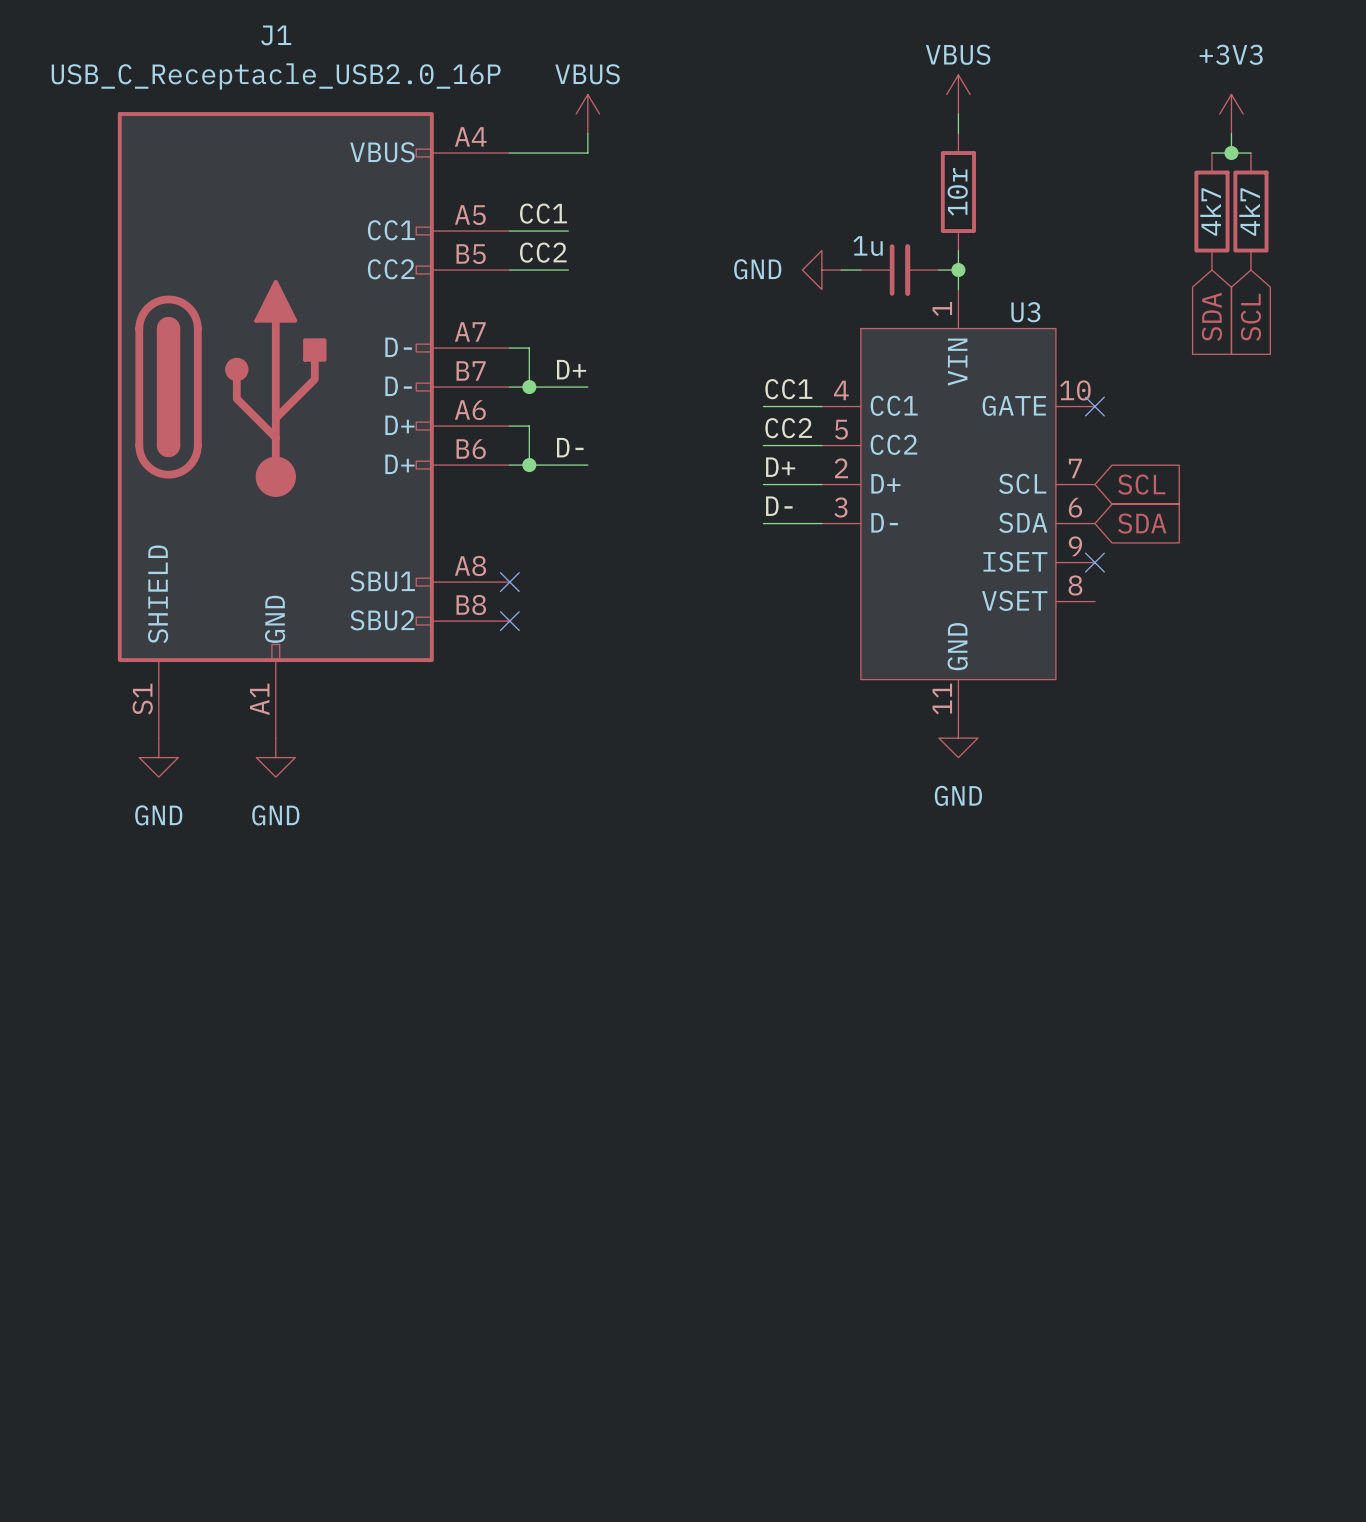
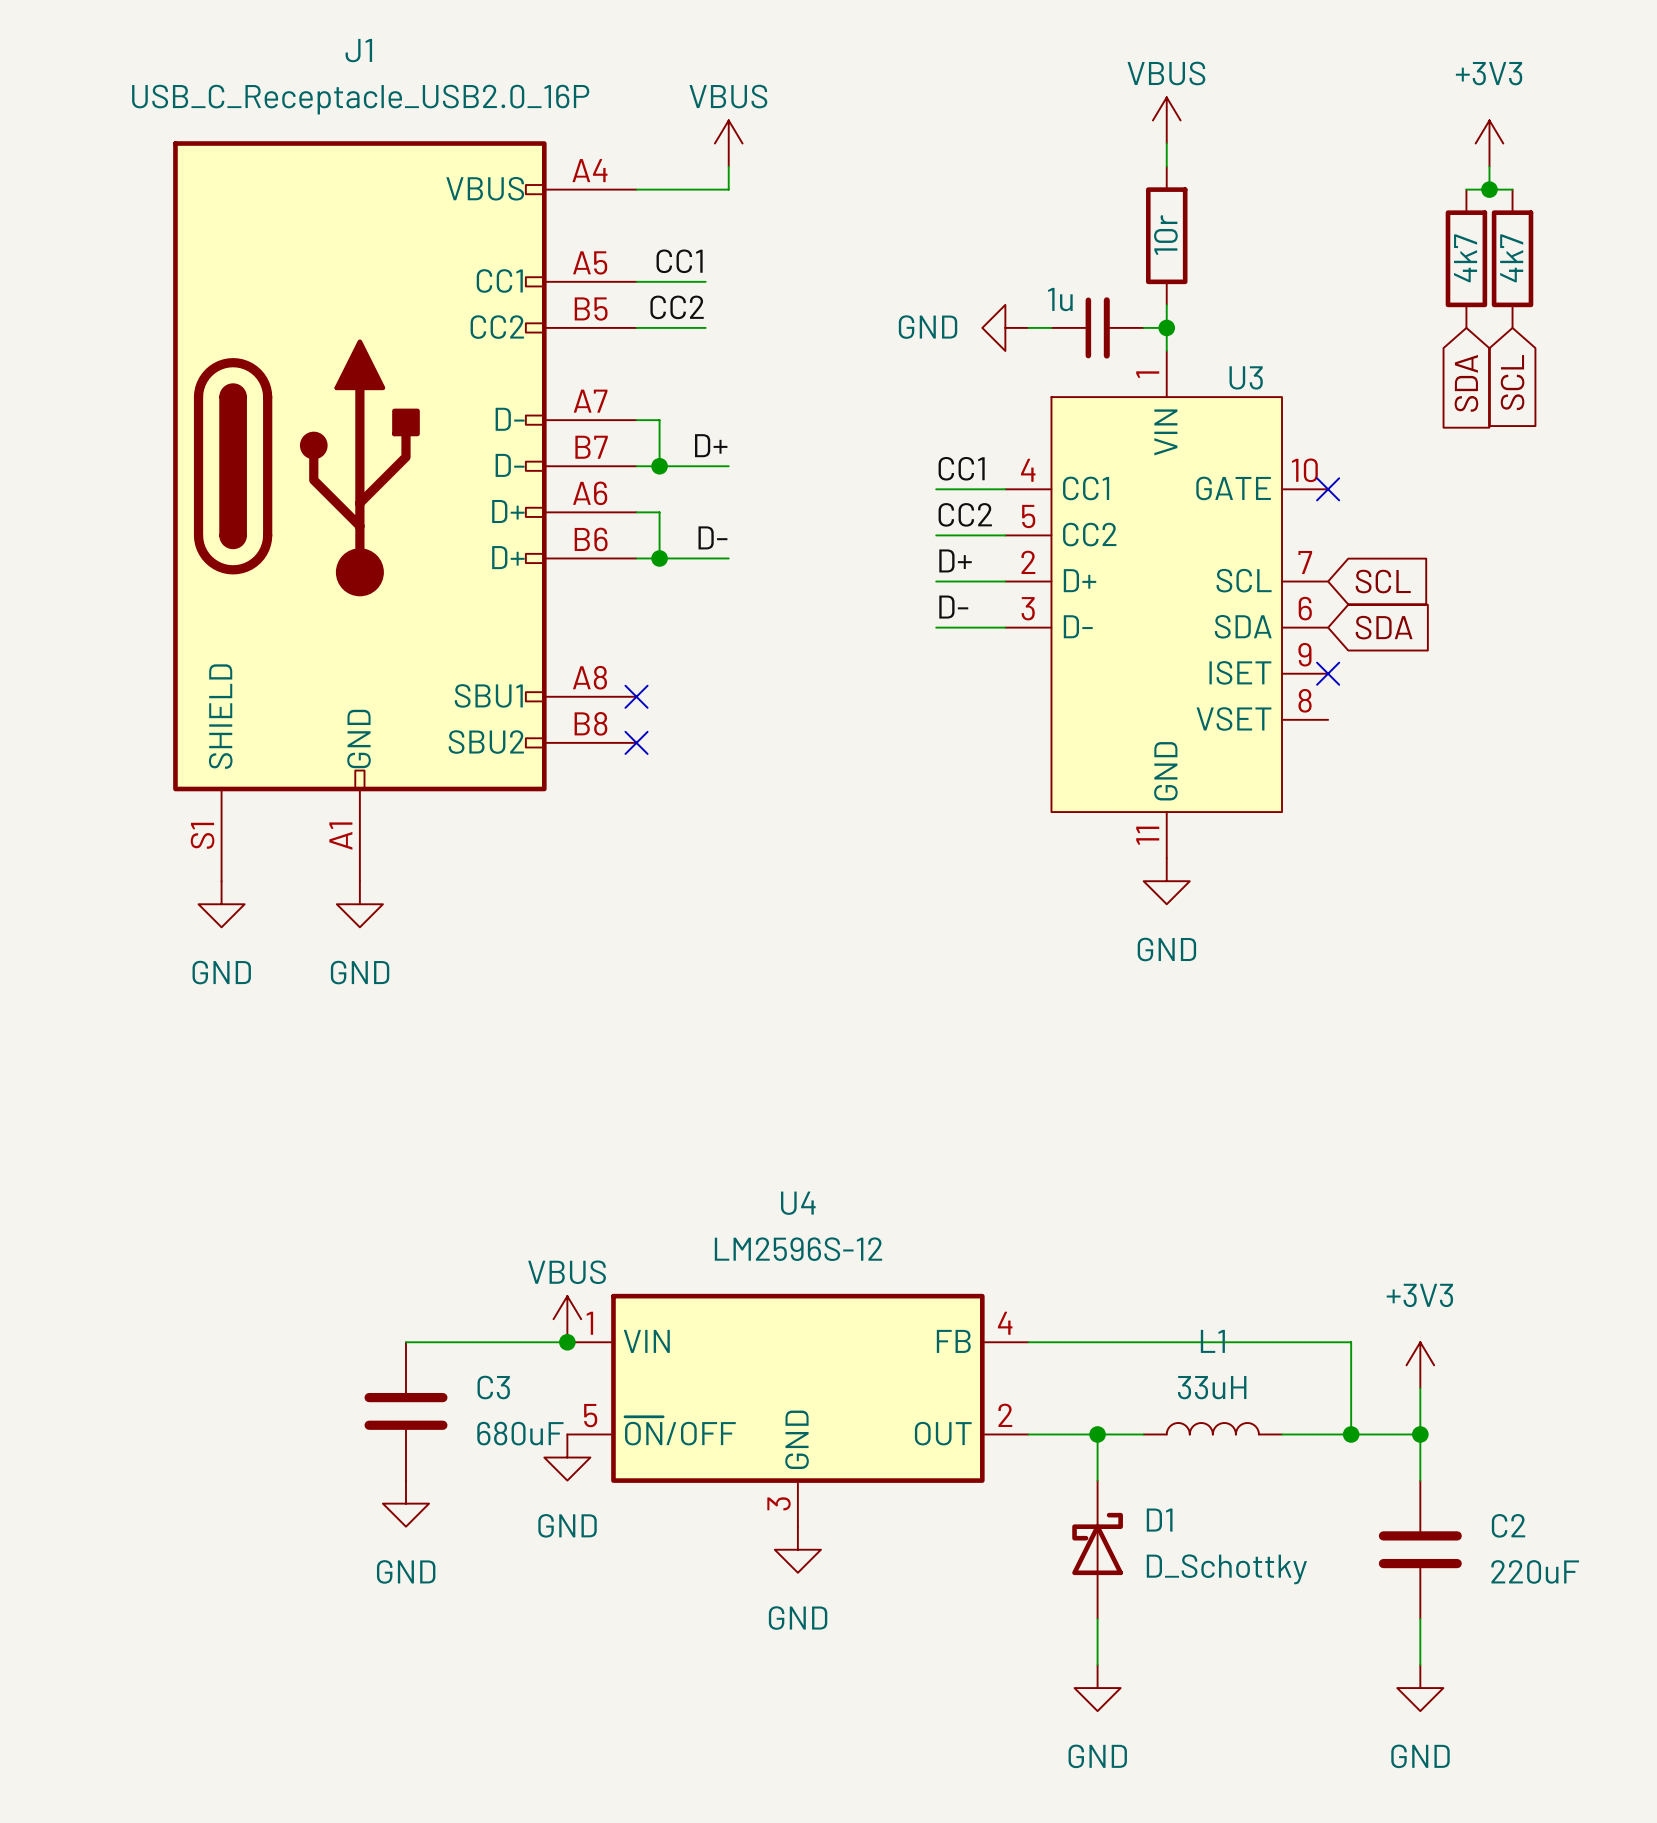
power symbol: none -> VBUS (567, 1319)
wire: none -> (405, 1342) (567, 1342)
junction: none -> (567, 1342)
wire: none -> (1028, 1342) (1351, 1342) (1351, 1434)
power symbol: none -> +3V3 (1420, 1365)
wire: none -> (1420, 1388) (1420, 1480)
U4: none -> LM2596S-12 (797, 1410)
C3: none -> 680uF (405, 1411)
L1: none -> 33uH (1212, 1428)
wire: none -> (1028, 1434) (1143, 1434)
wire: none -> (1097, 1434) (1097, 1480)
junction: none -> (1097, 1434)
wire: none -> (1282, 1434) (1420, 1434)
junction: none -> (1351, 1434)
junction: none -> (1420, 1434)
power symbol: none -> GND (567, 1457)
power symbol: none -> GND (405, 1503)
power symbol: none -> GND (797, 1549)
D1: none -> D_Schottky (1097, 1549)
C2: none -> 220uF (1420, 1549)
wire: none -> (1097, 1618) (1097, 1665)
wire: none -> (1420, 1618) (1420, 1665)
power symbol: none -> GND (1097, 1688)
power symbol: none -> GND (1420, 1688)

